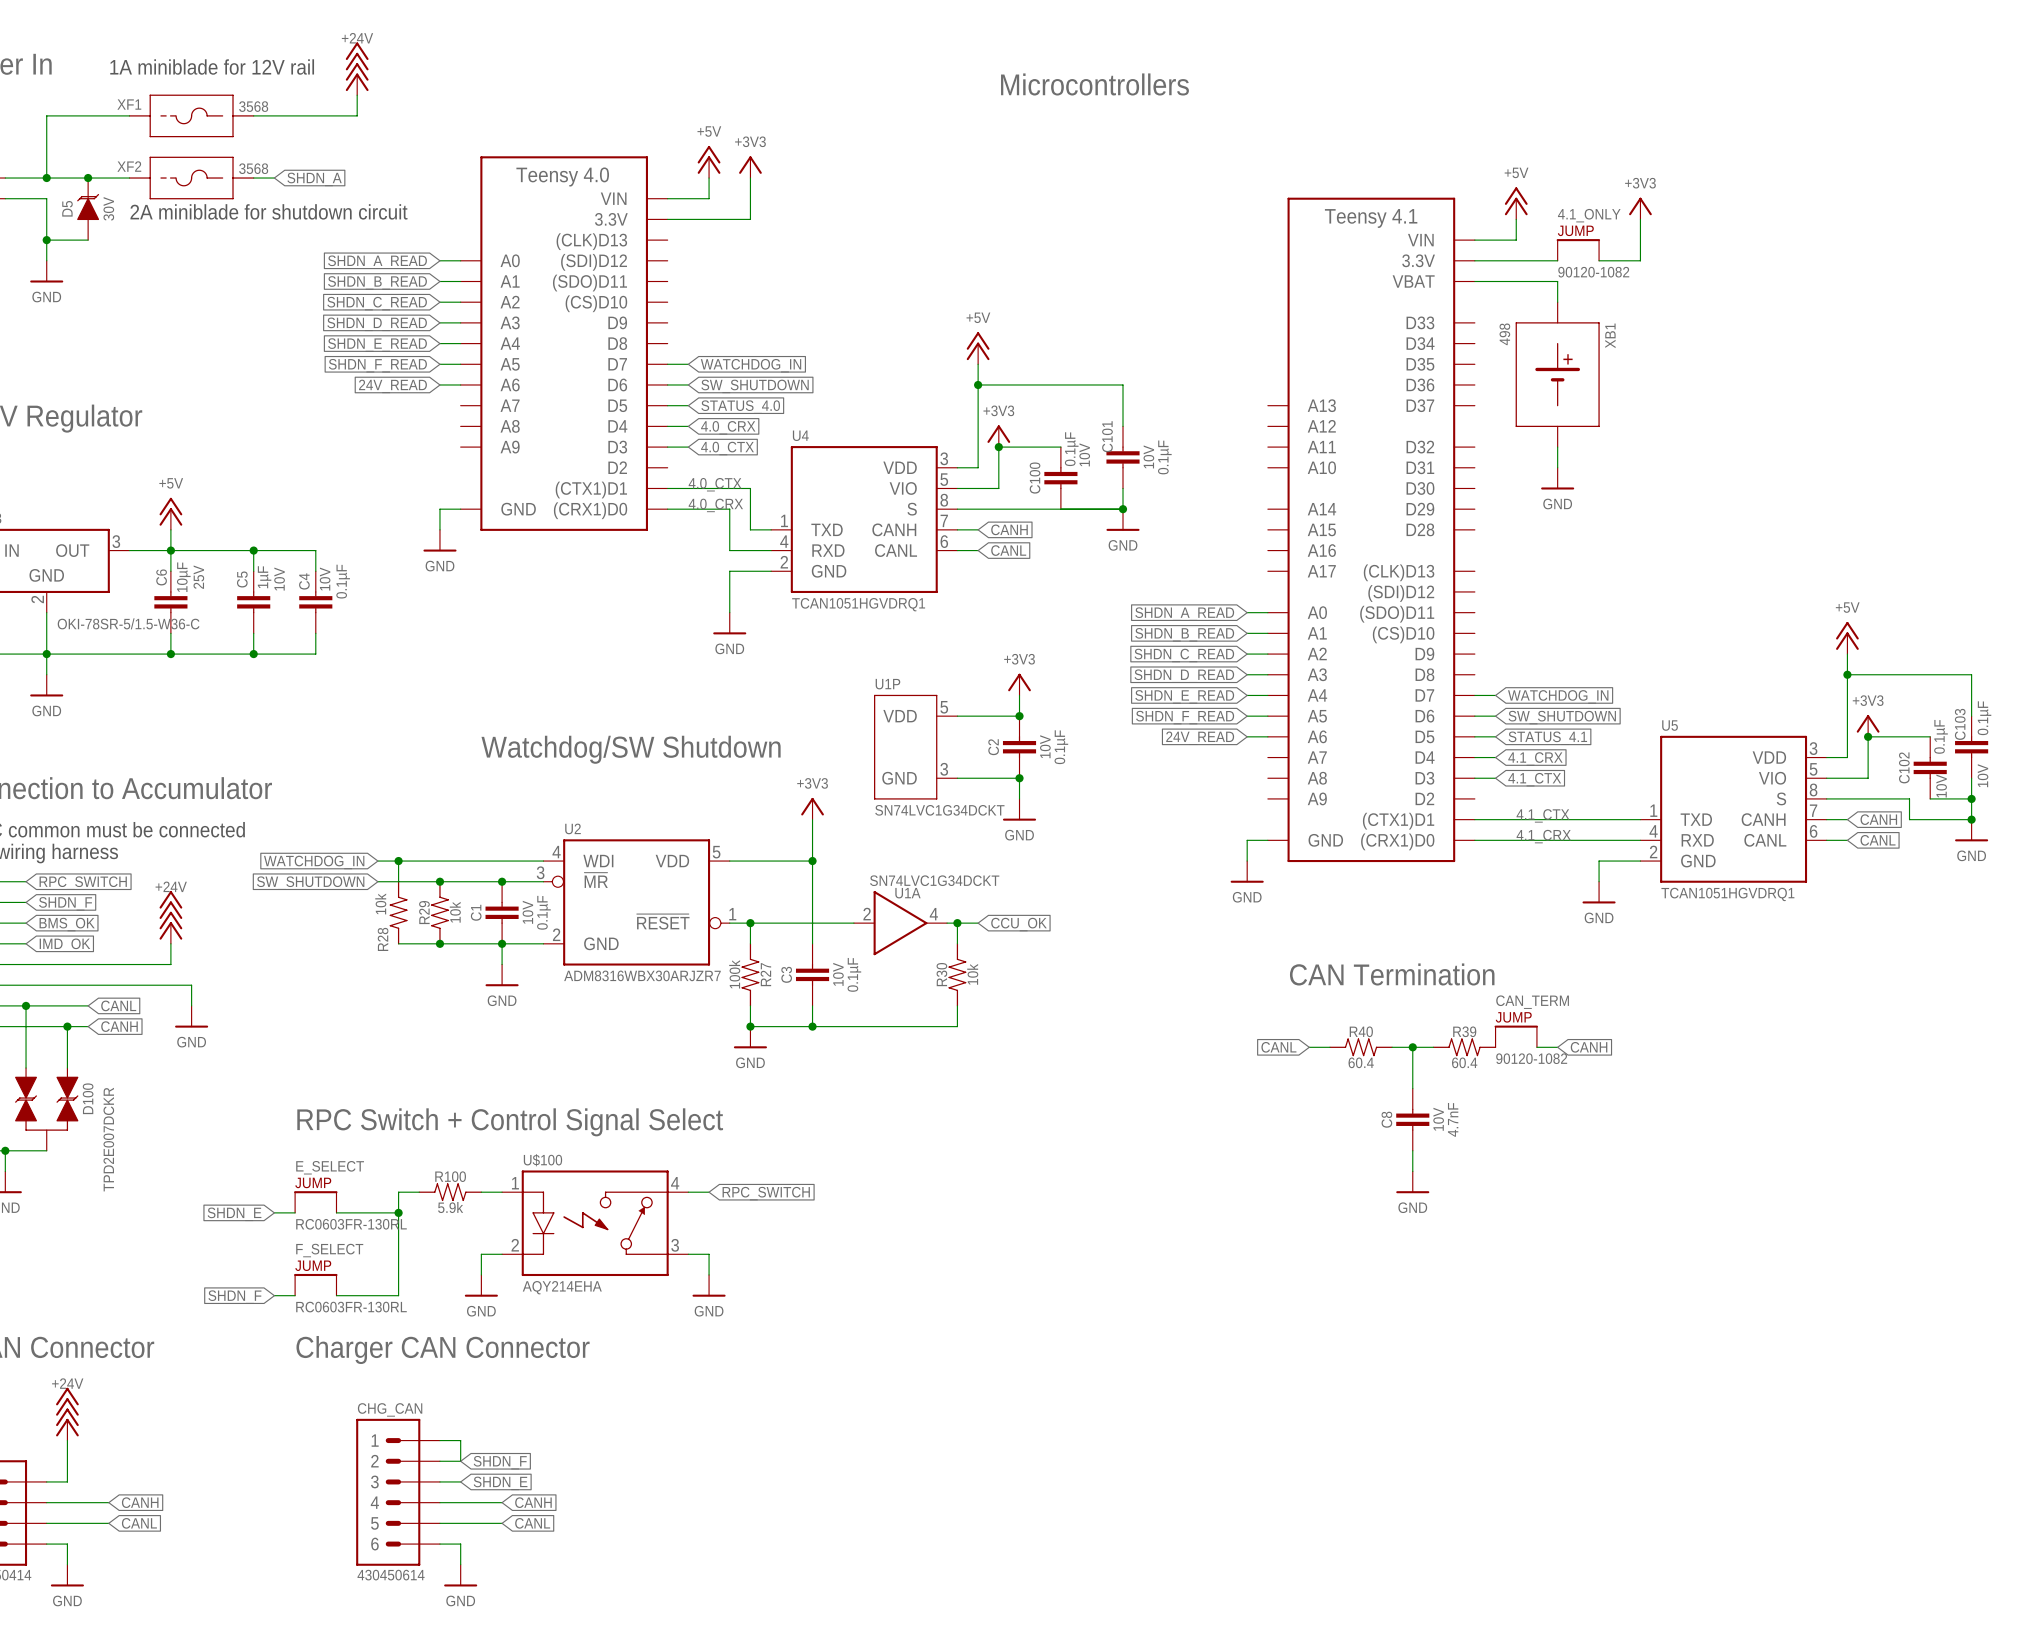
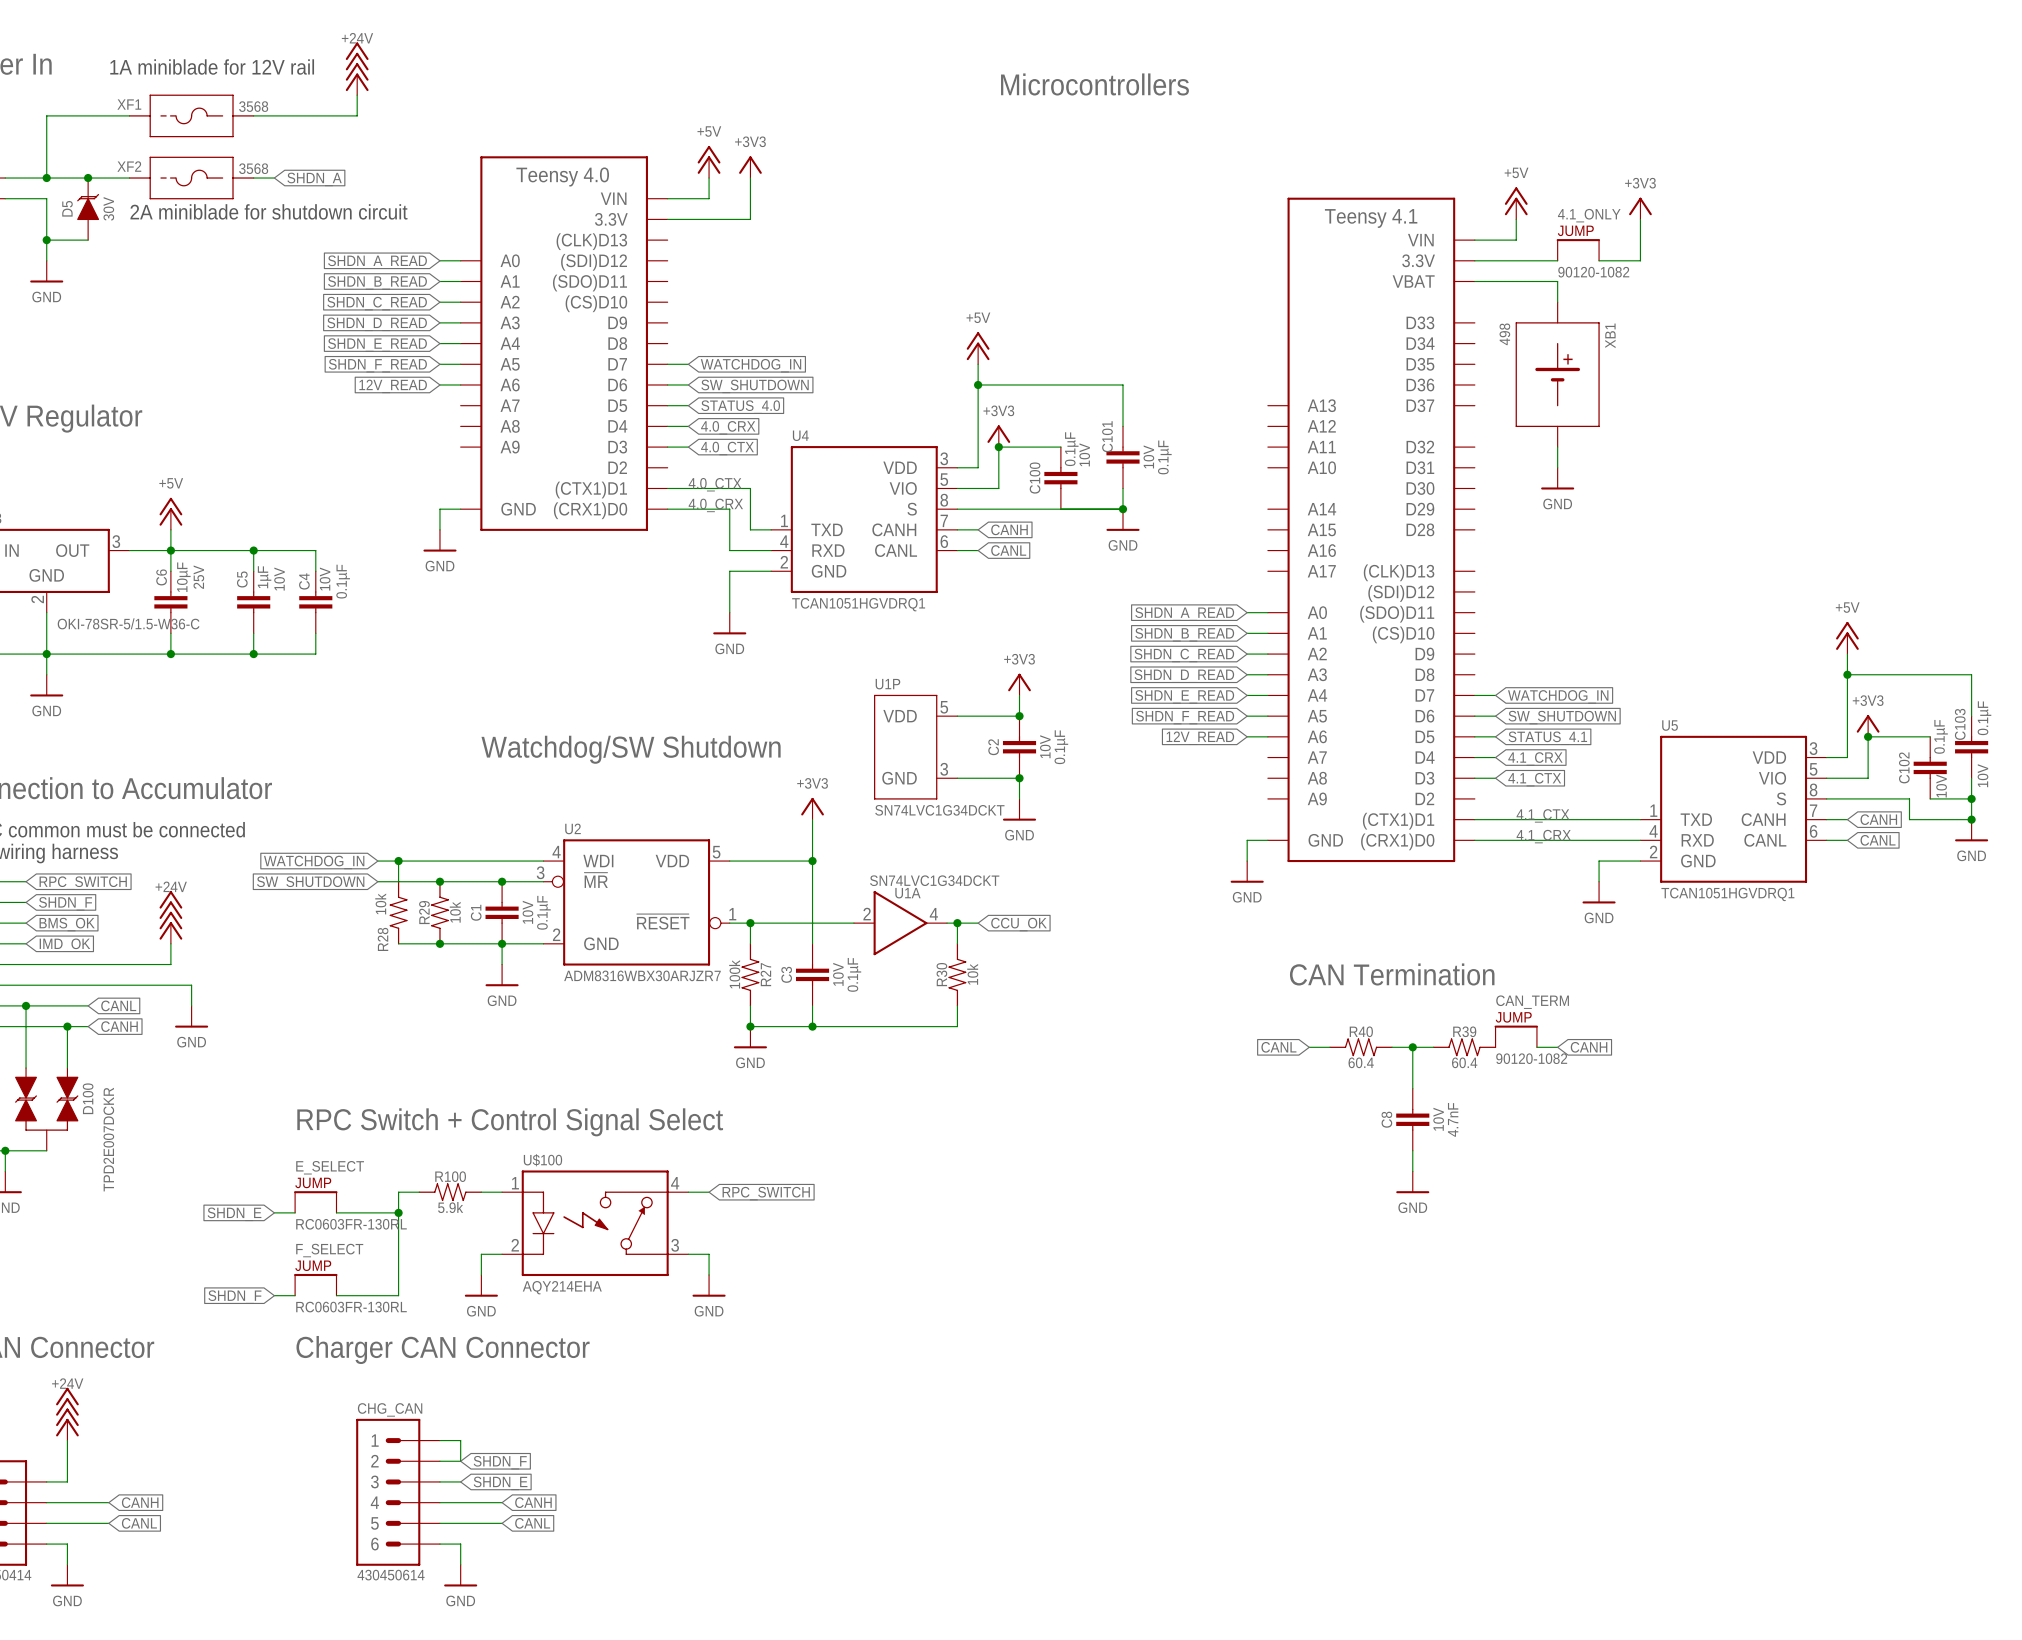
global label: 24V_READ (392, 386) -> 12V_READ (393, 386)
global label: 24V_READ (1200, 738) -> 12V_READ (1200, 738)

